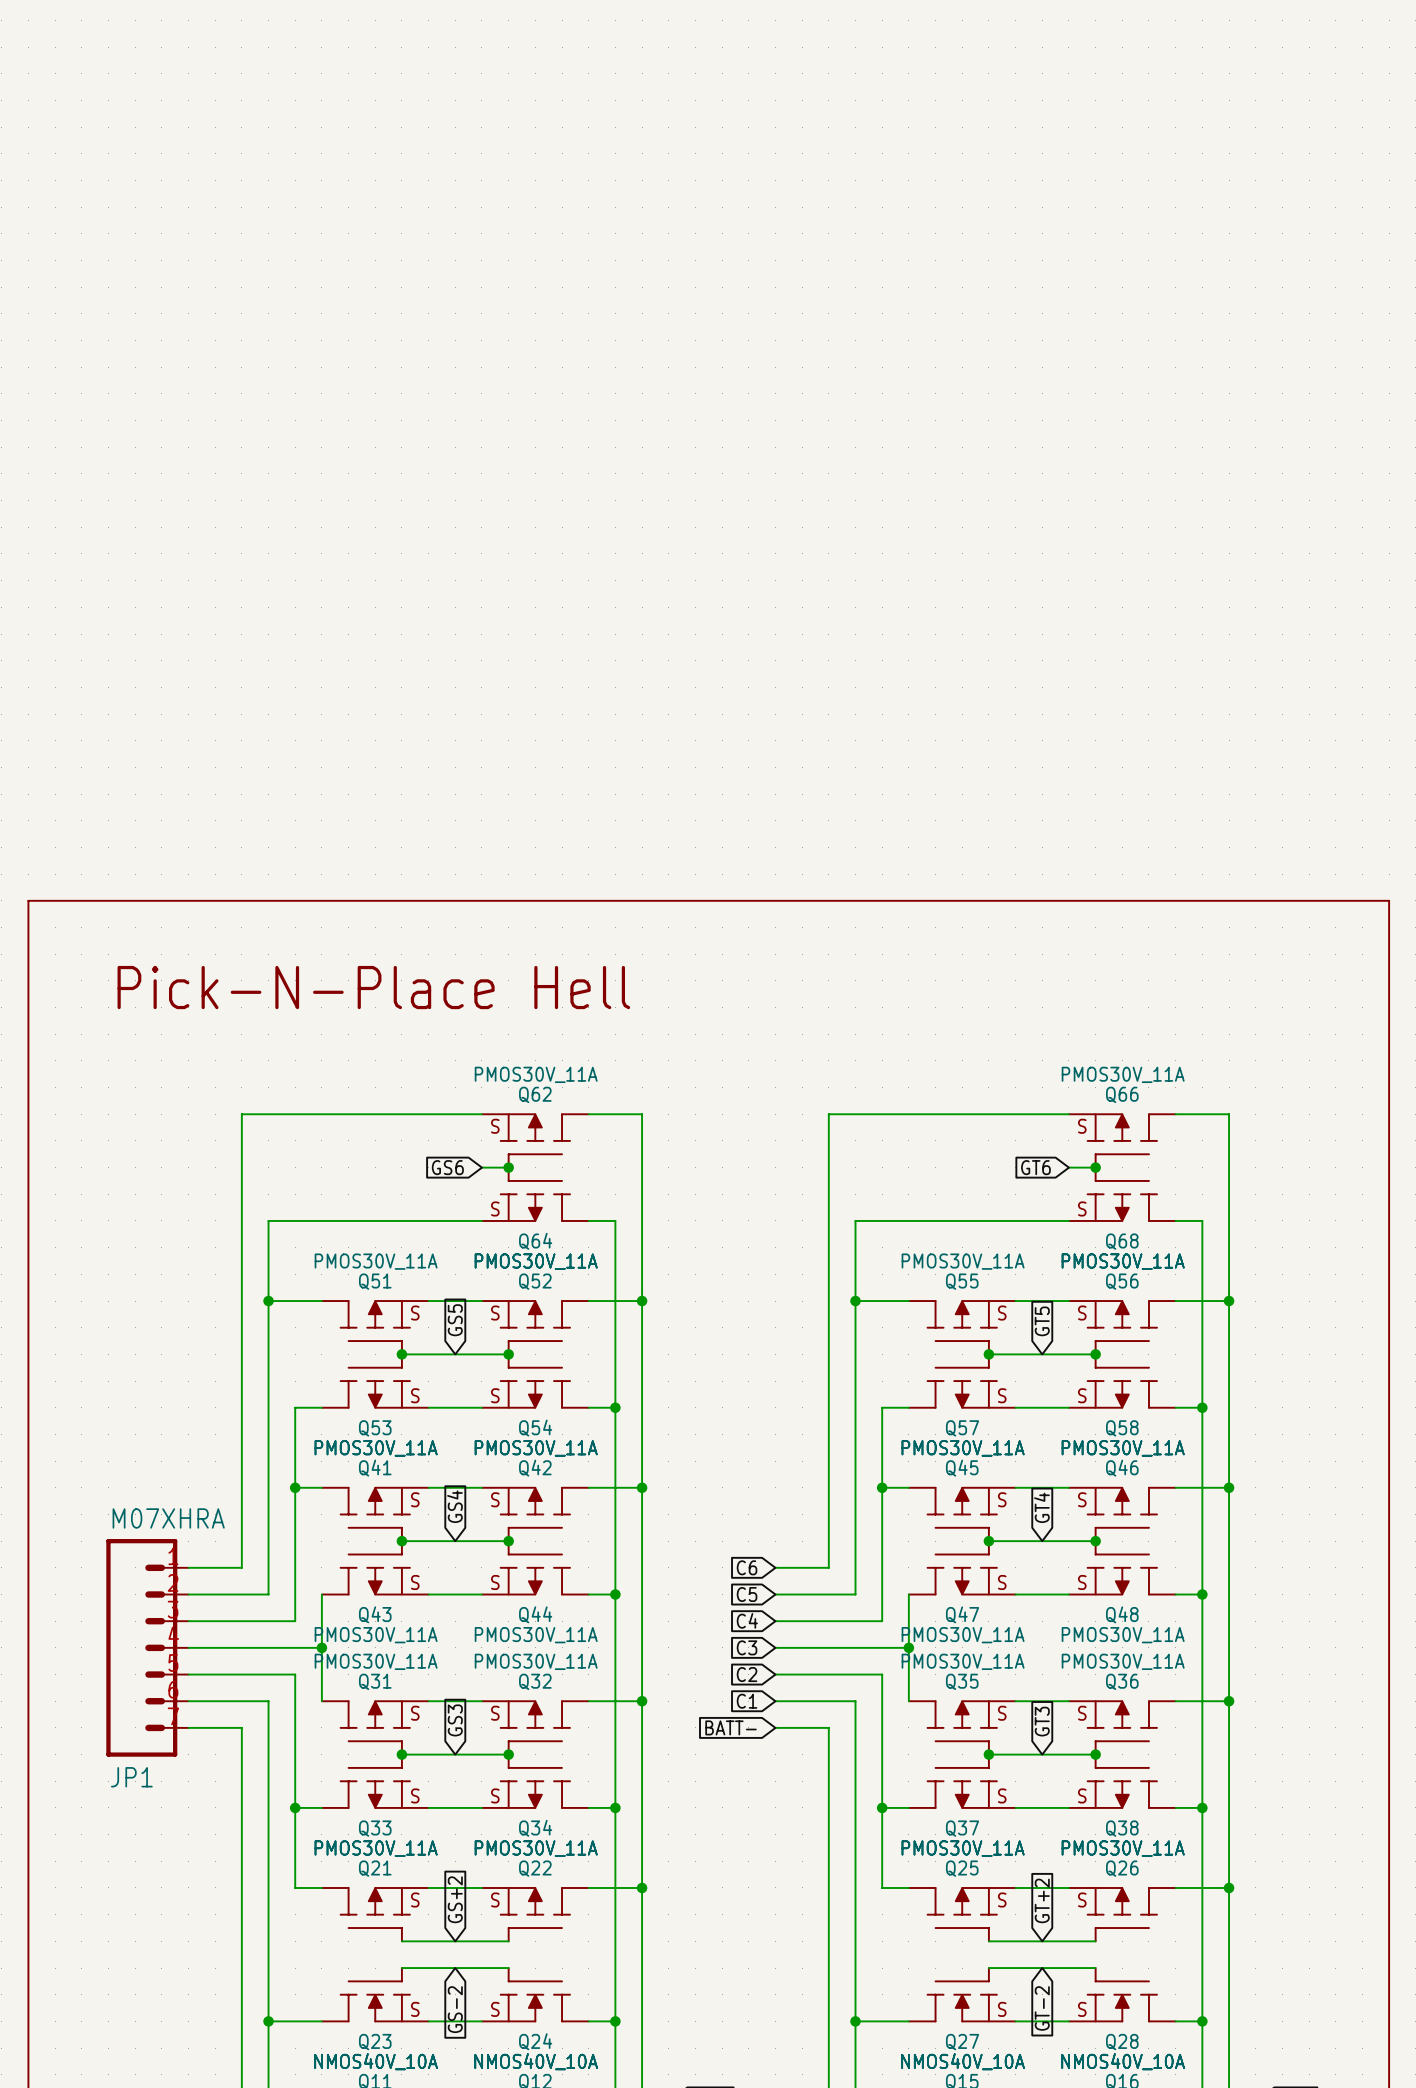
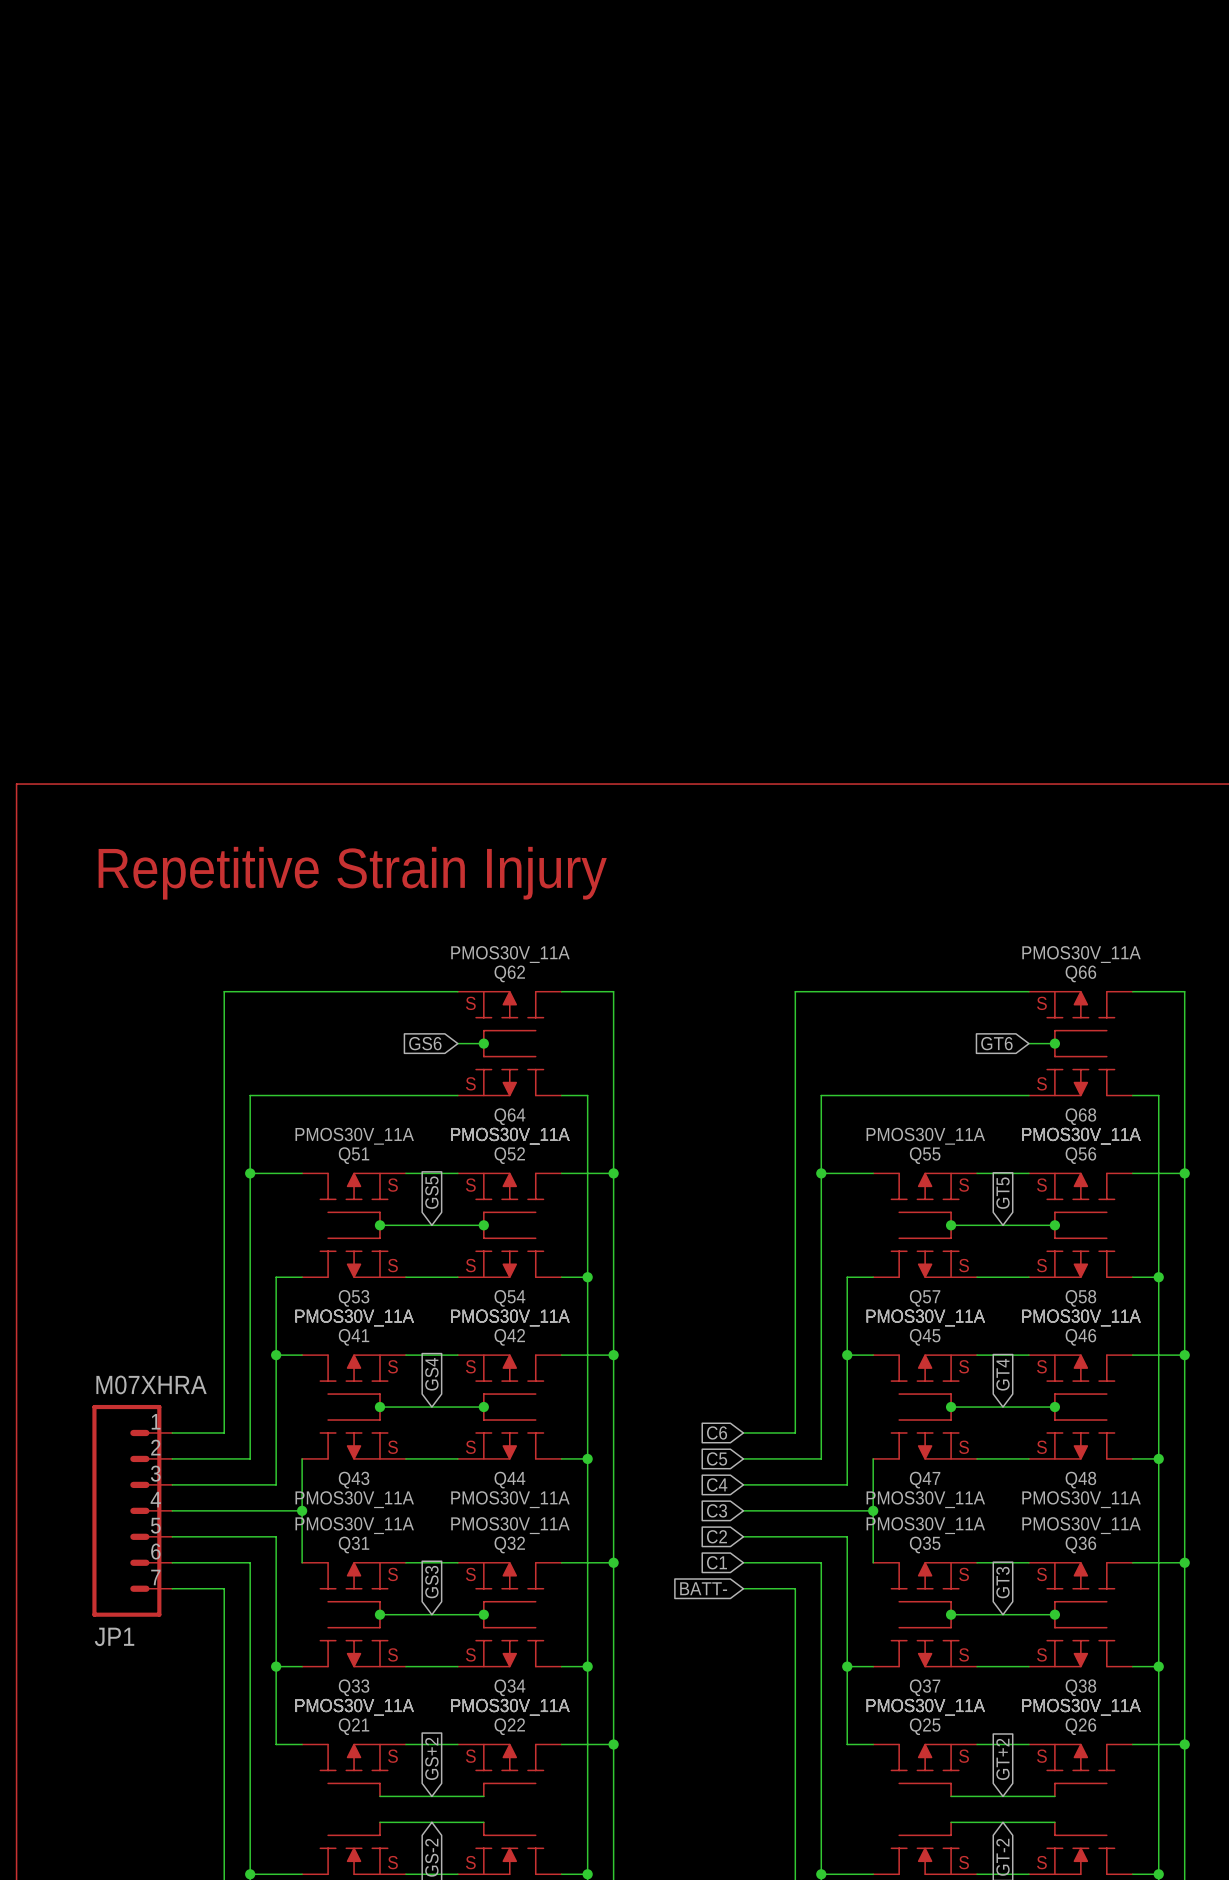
text: Pick-N-Place Hell (373, 987) -> Repetitive Strain Injury (352, 873)

